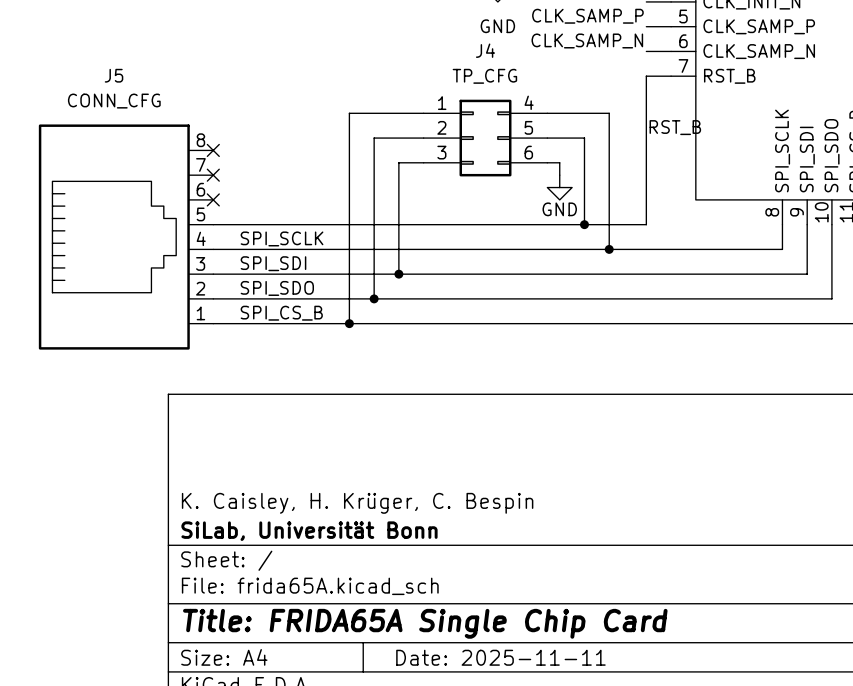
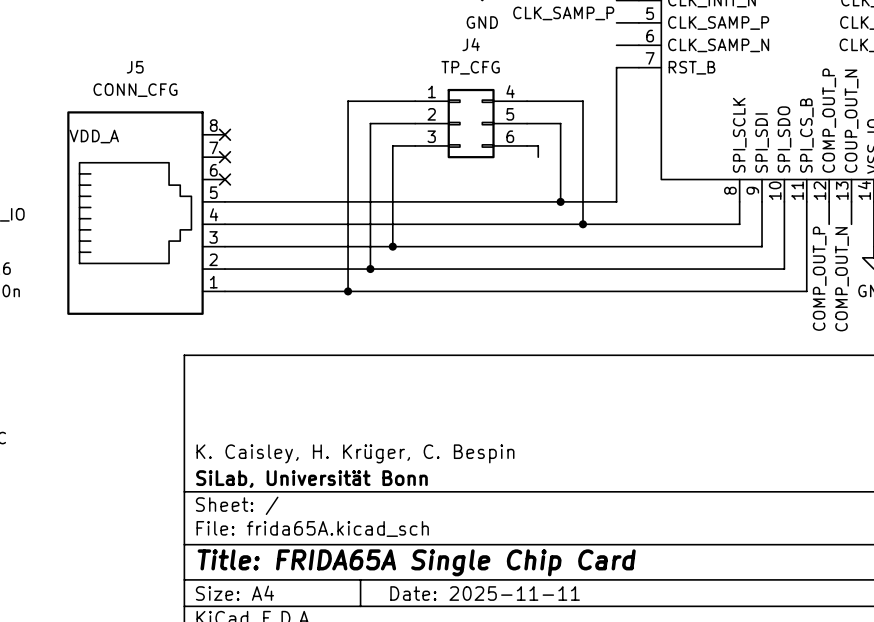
label: CLK_SAMP_N (587, 40) -> none
label: RST_B (675, 127) -> none
label: none -> VDD_A (94, 136)
power symbol: GND (559, 187) -> none
label: SPI_SCLK (282, 238) -> none
label: SPI_SDI (273, 263) -> none
label: SPI_SDO (277, 288) -> none
label: SPI_CS_B (281, 313) -> none

